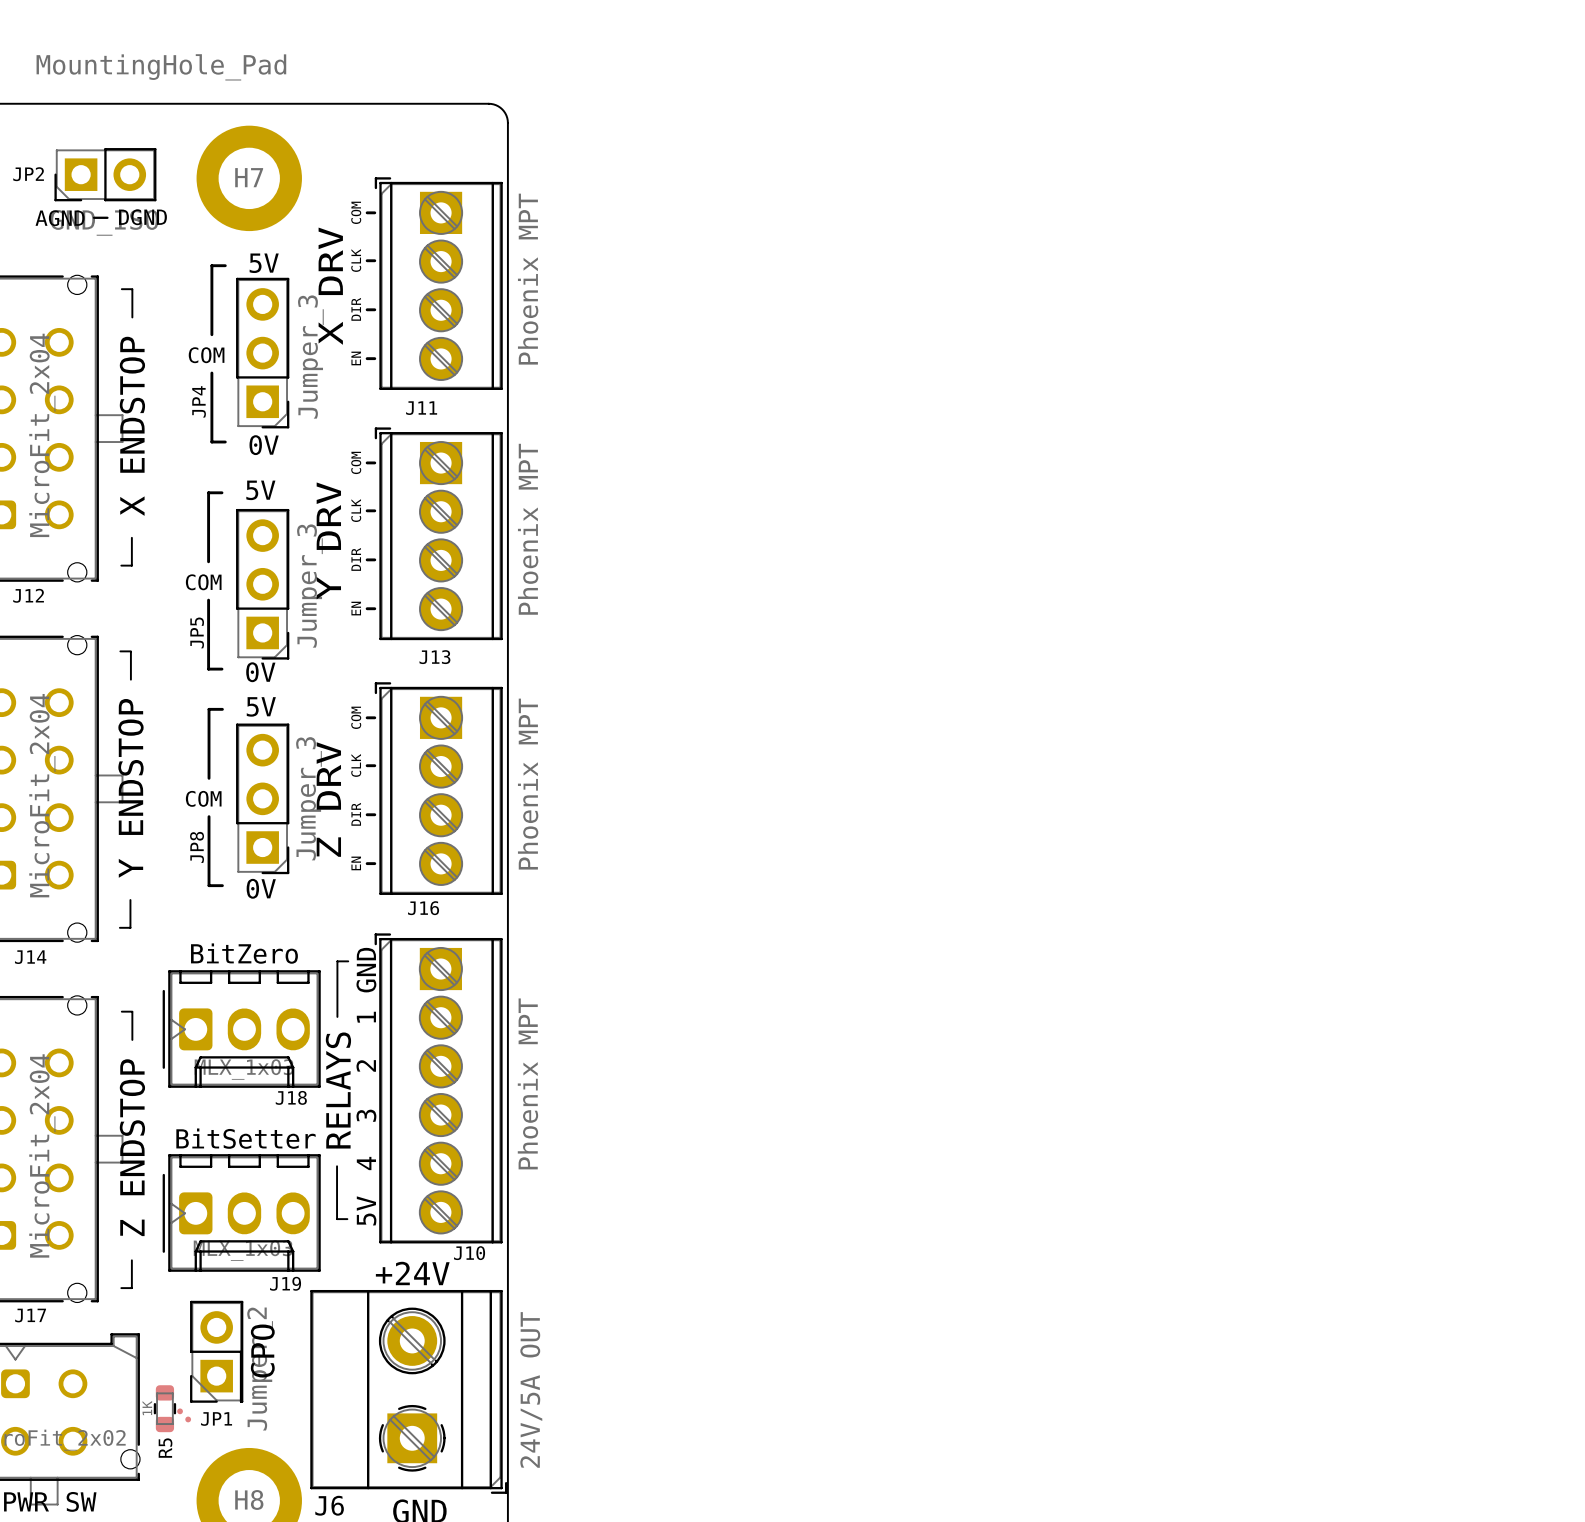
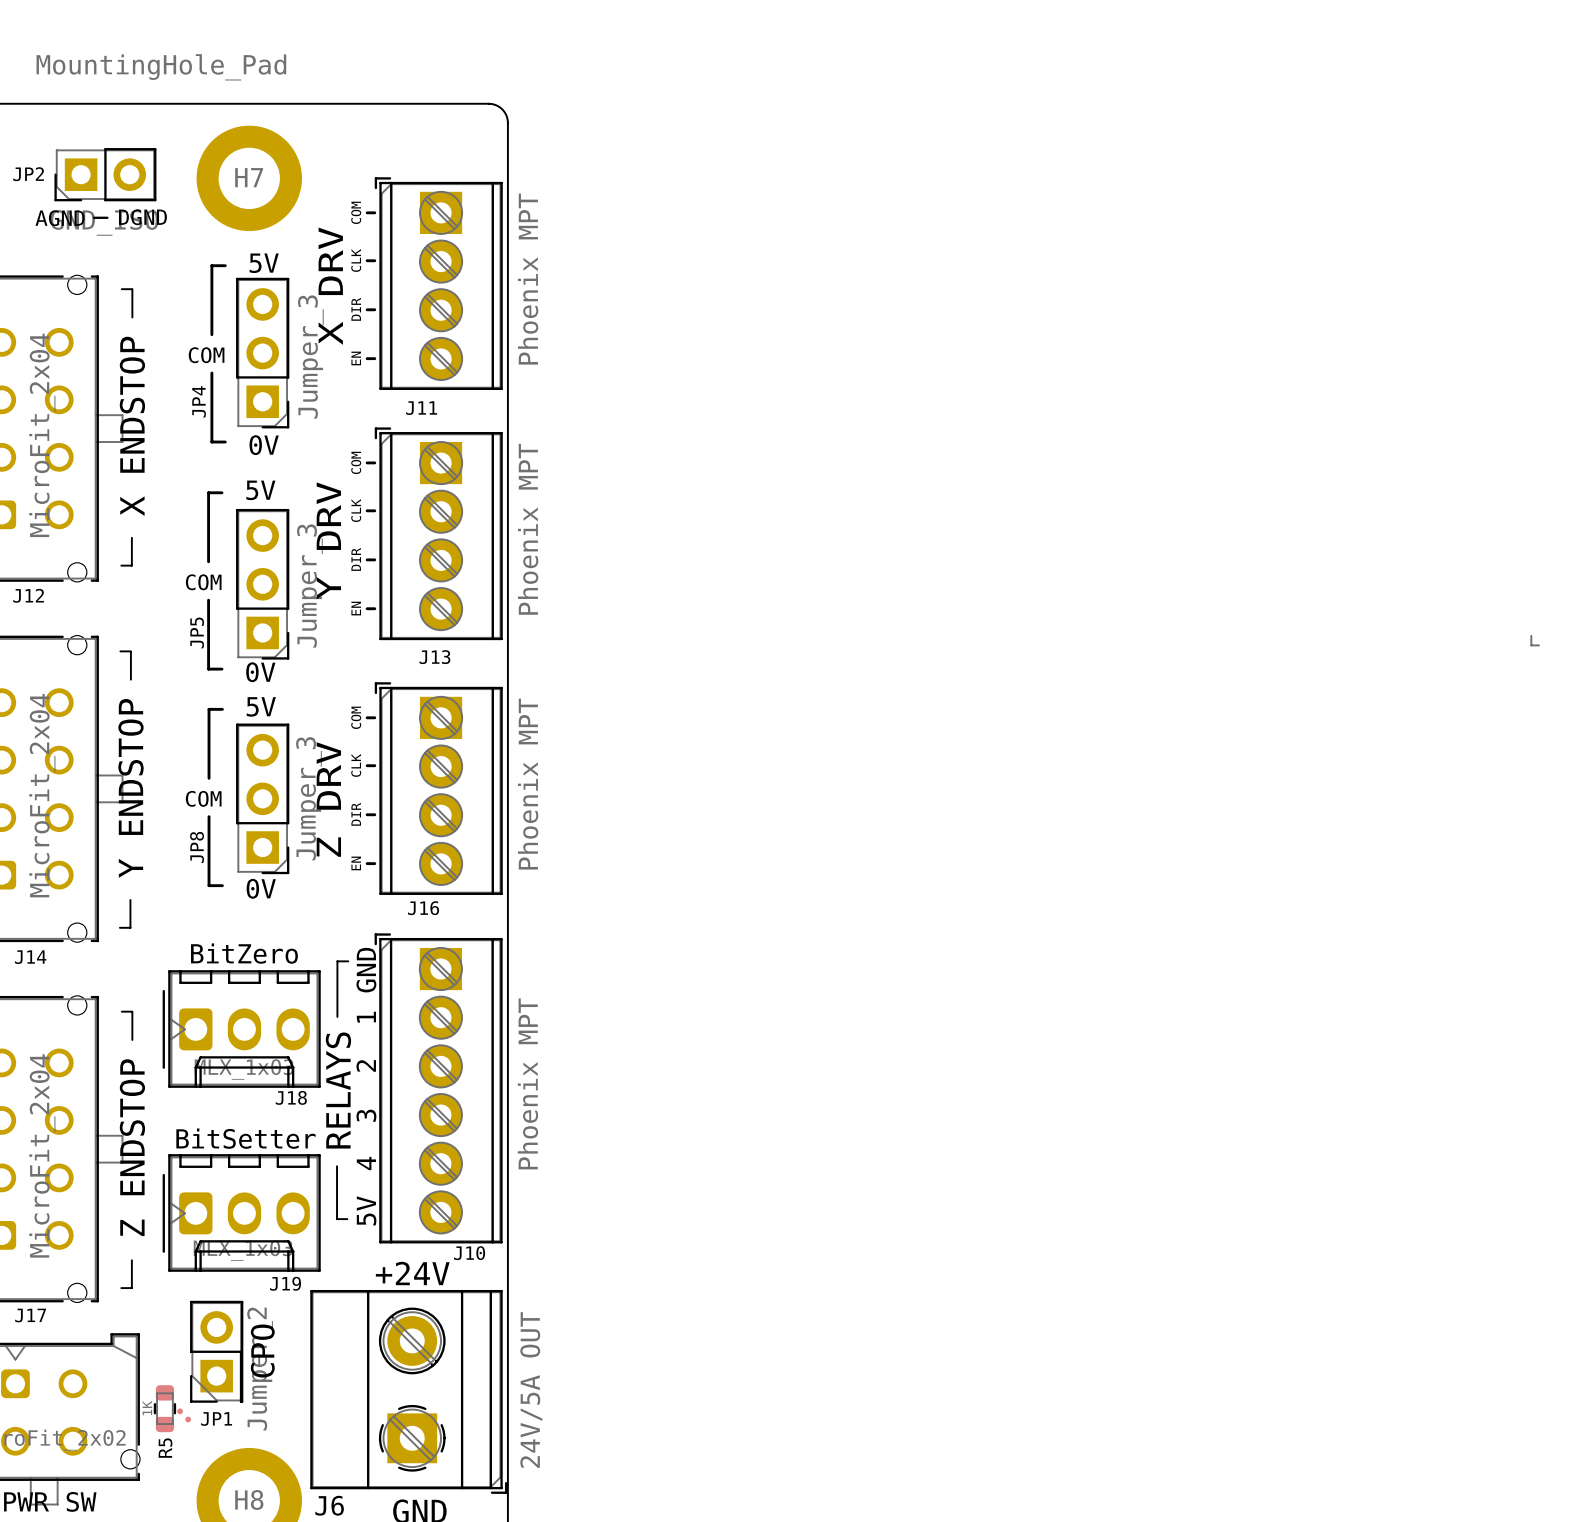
line: none -> (1531, 635) (1531, 645) (1539, 645)

